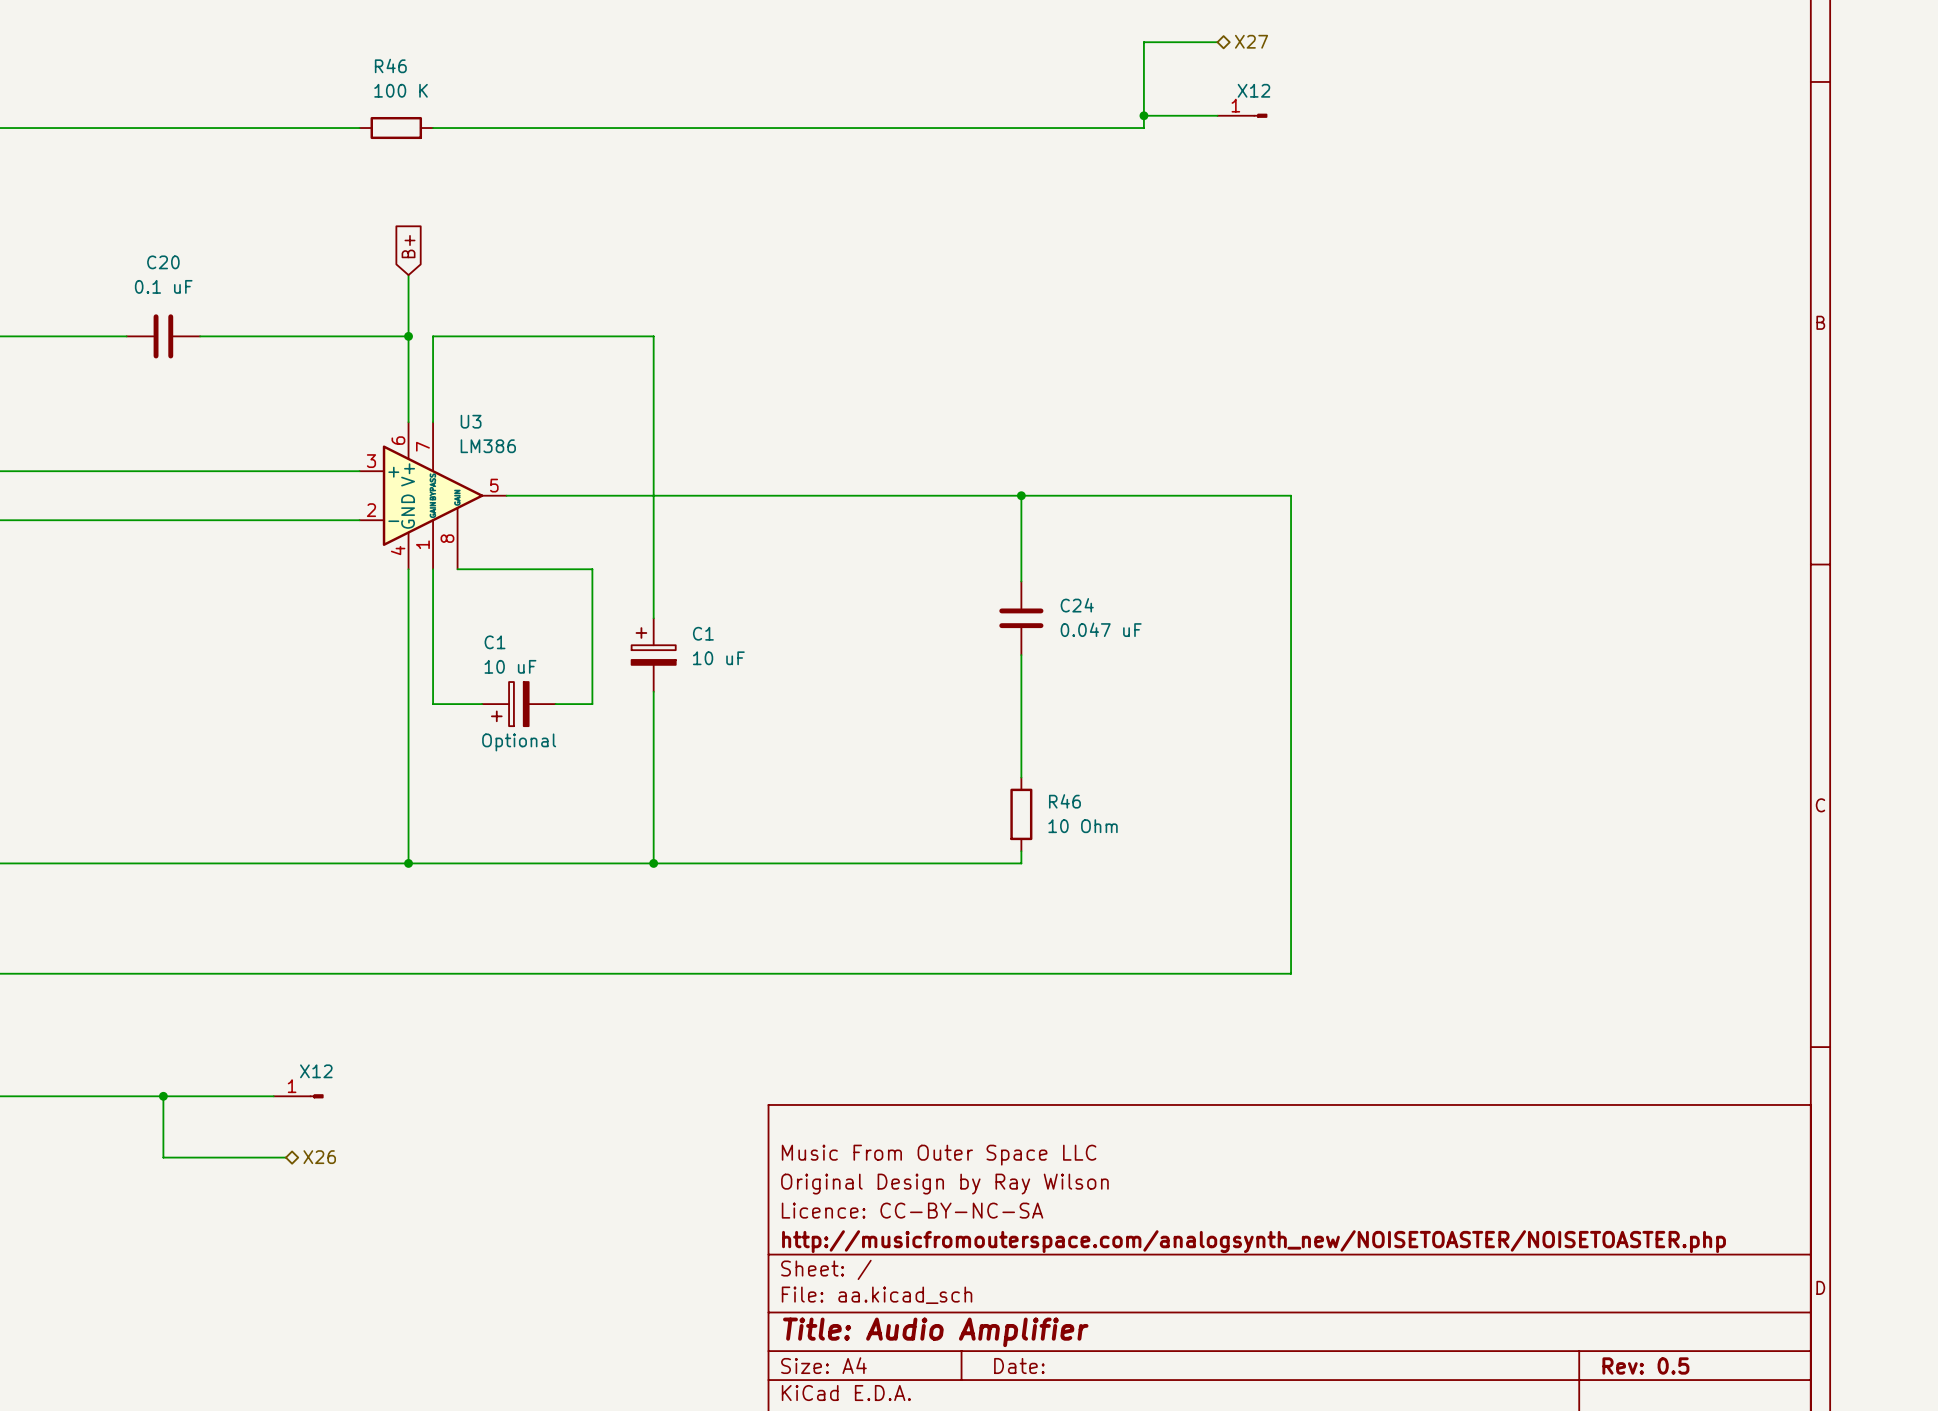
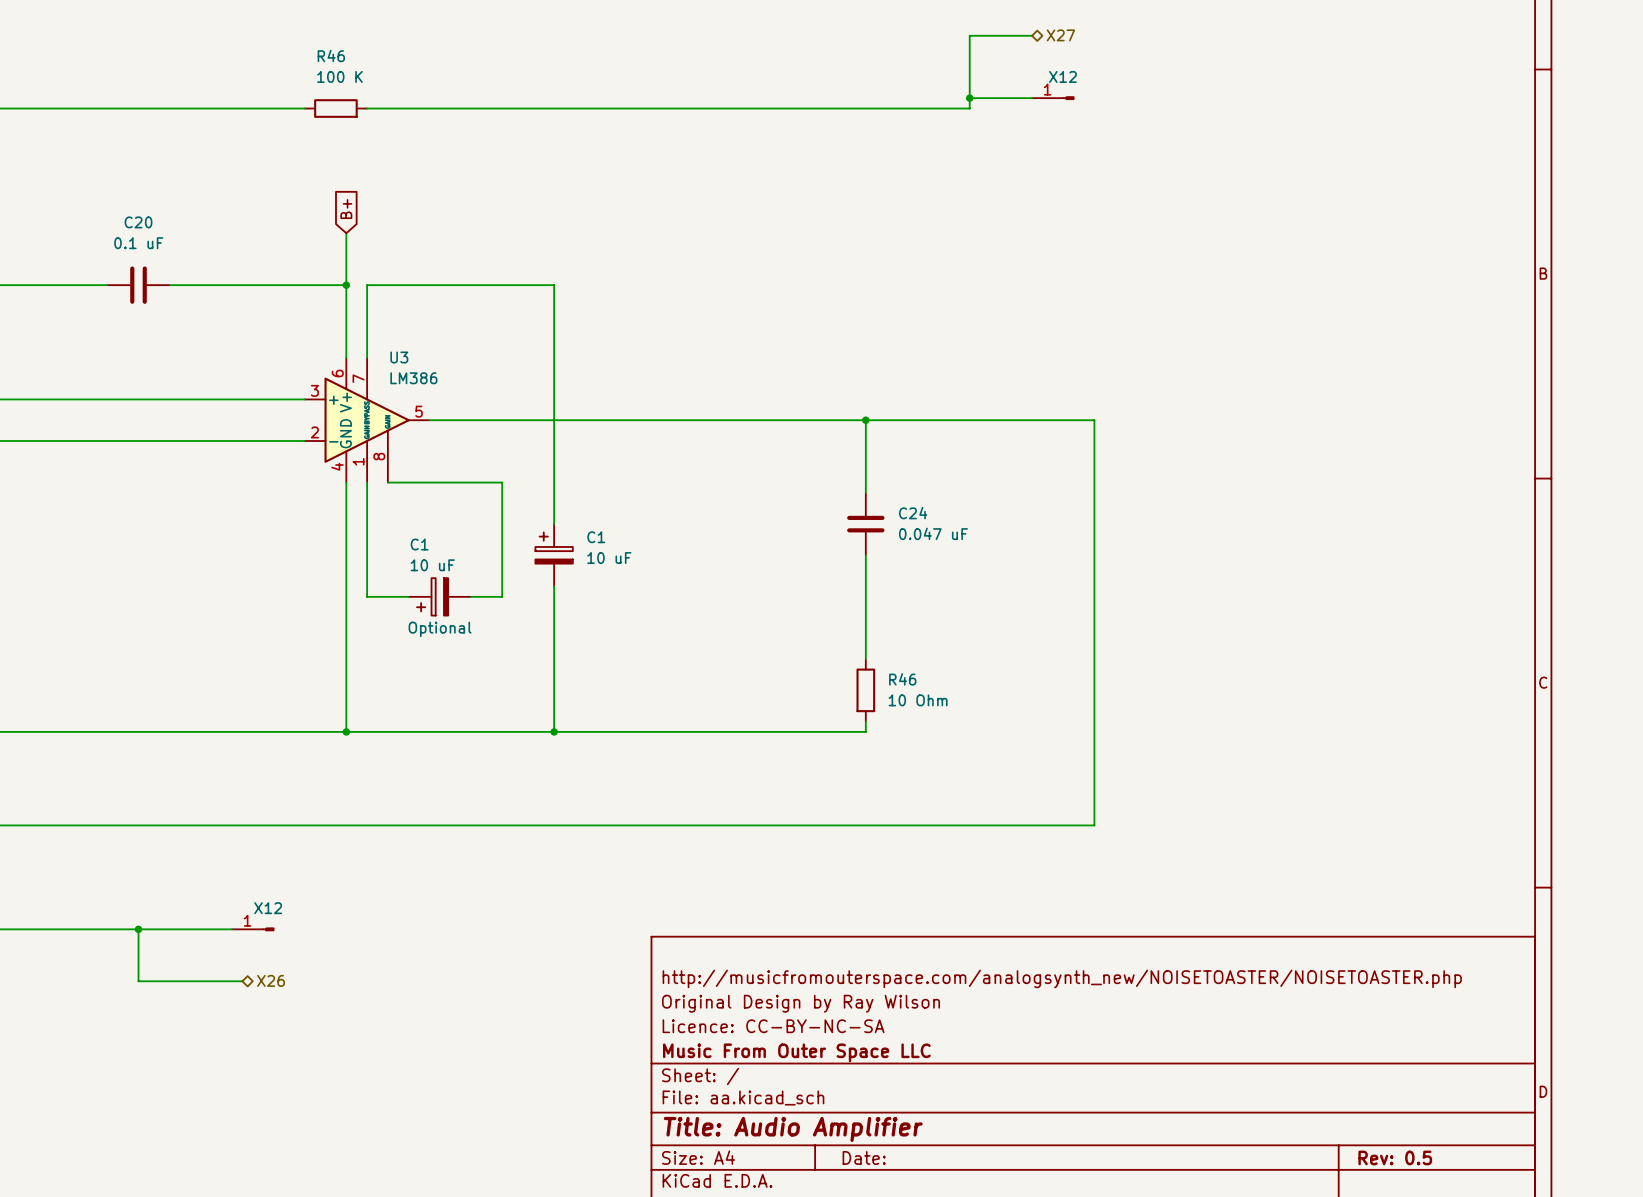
title block: Music From Outer Space LLC (939, 1155) -> http://musicfromouterspace.com/analogsynth_new/NOISETOASTER/NOISETOASTER.php (1062, 978)
title block: http://musicfromouterspace.com/analogsynth_new/NOISETOASTER/NOISETOASTER.php (1254, 1241) -> Music From Outer Space LLC (796, 1052)

